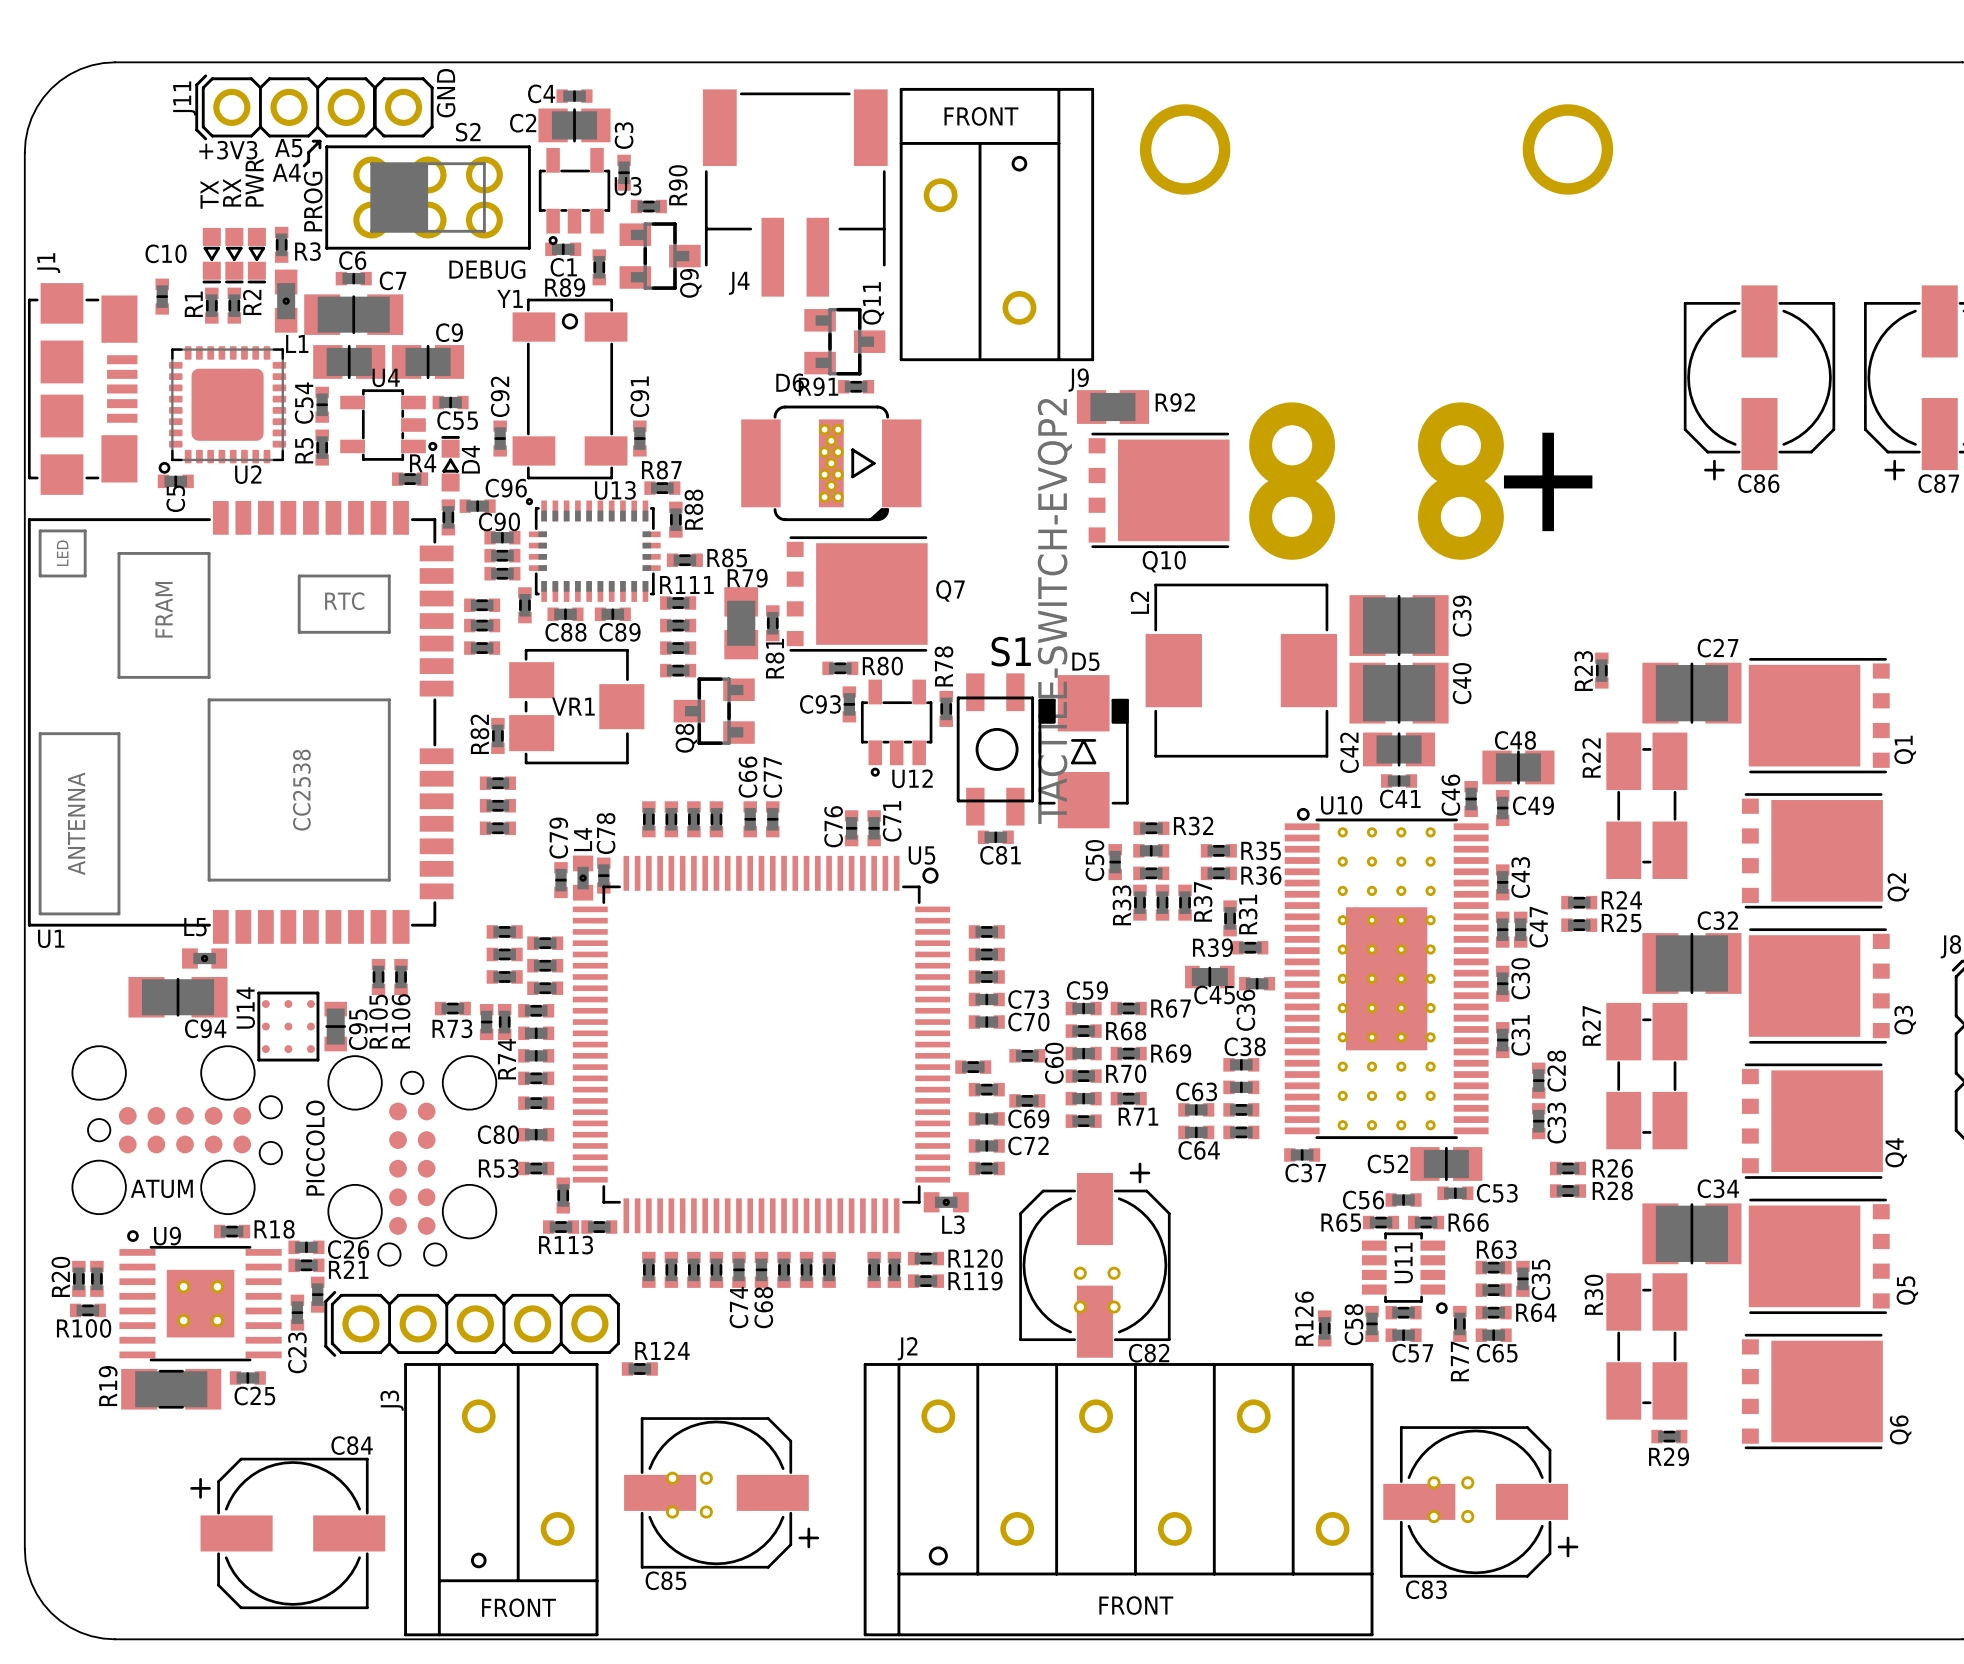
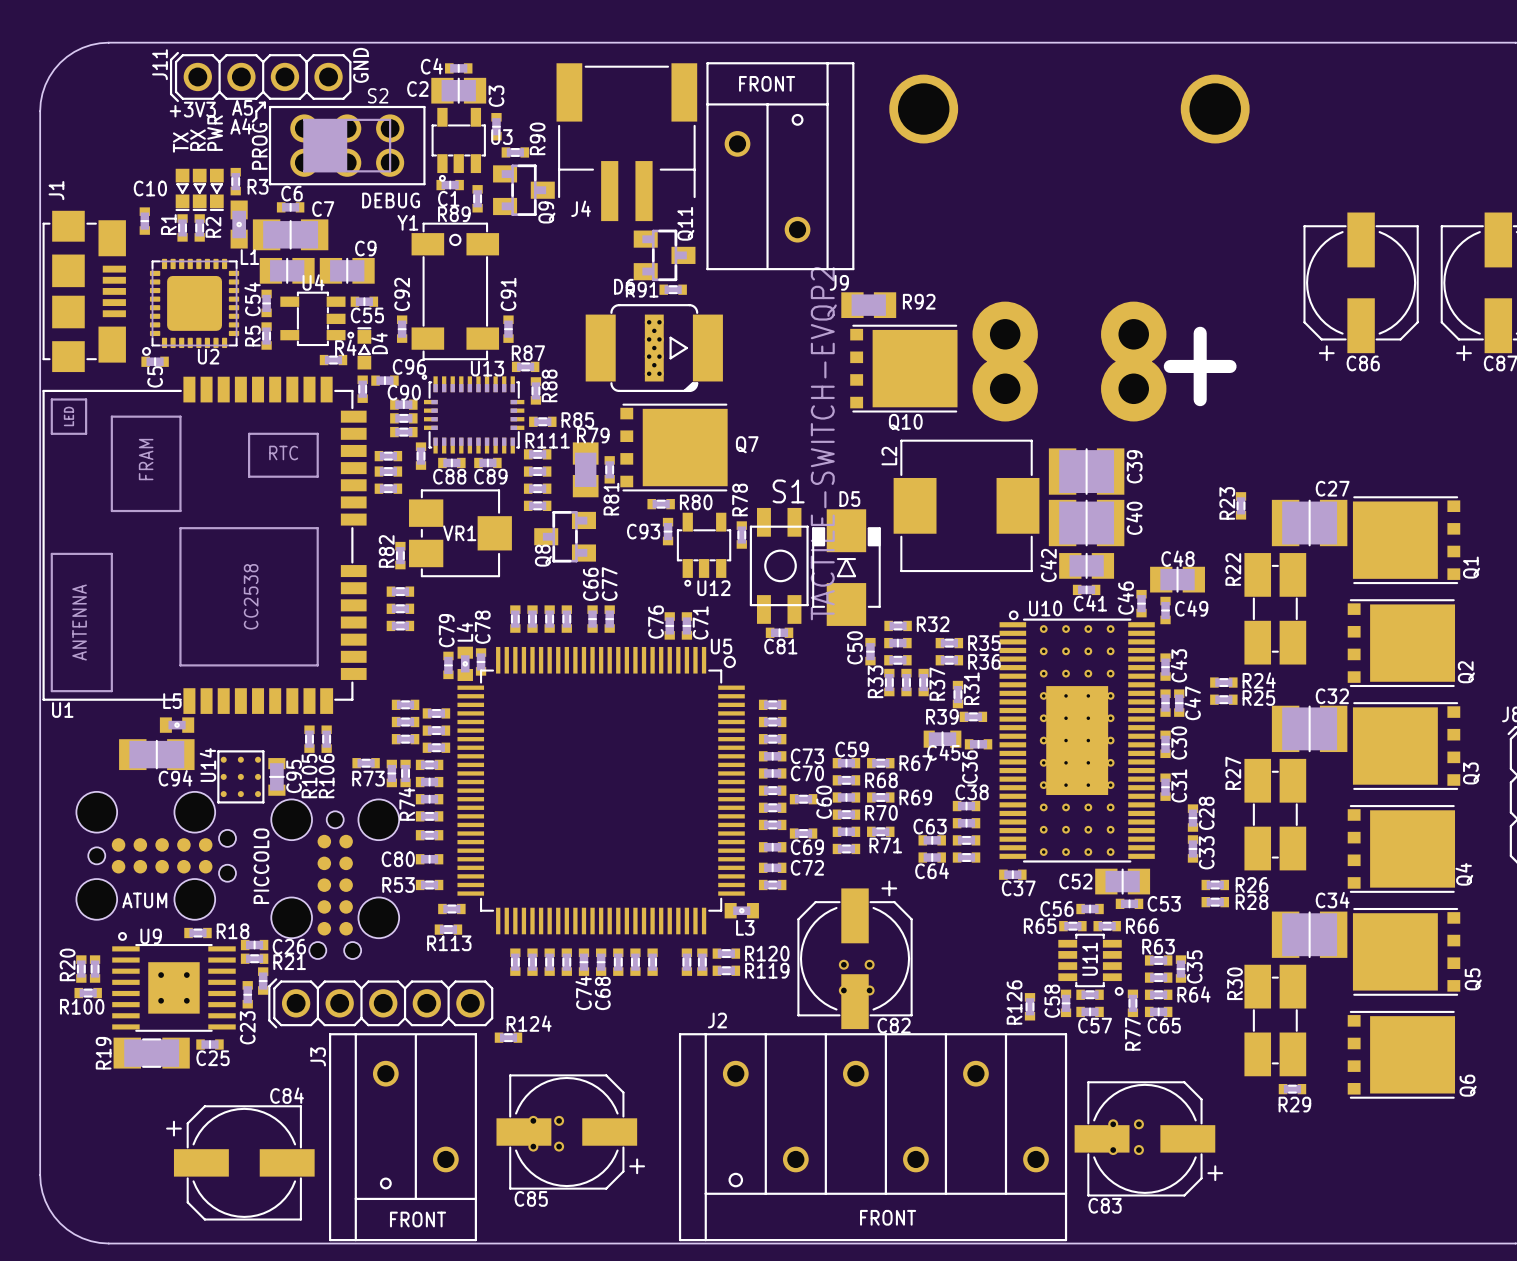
part: none -> (772, 790)
part: (973, 1067) -> none
part: none -> (772, 807)
part rotation: 0° (563, 1195) -> 90° clockwise (451, 909)
part: (599, 1227) -> none

